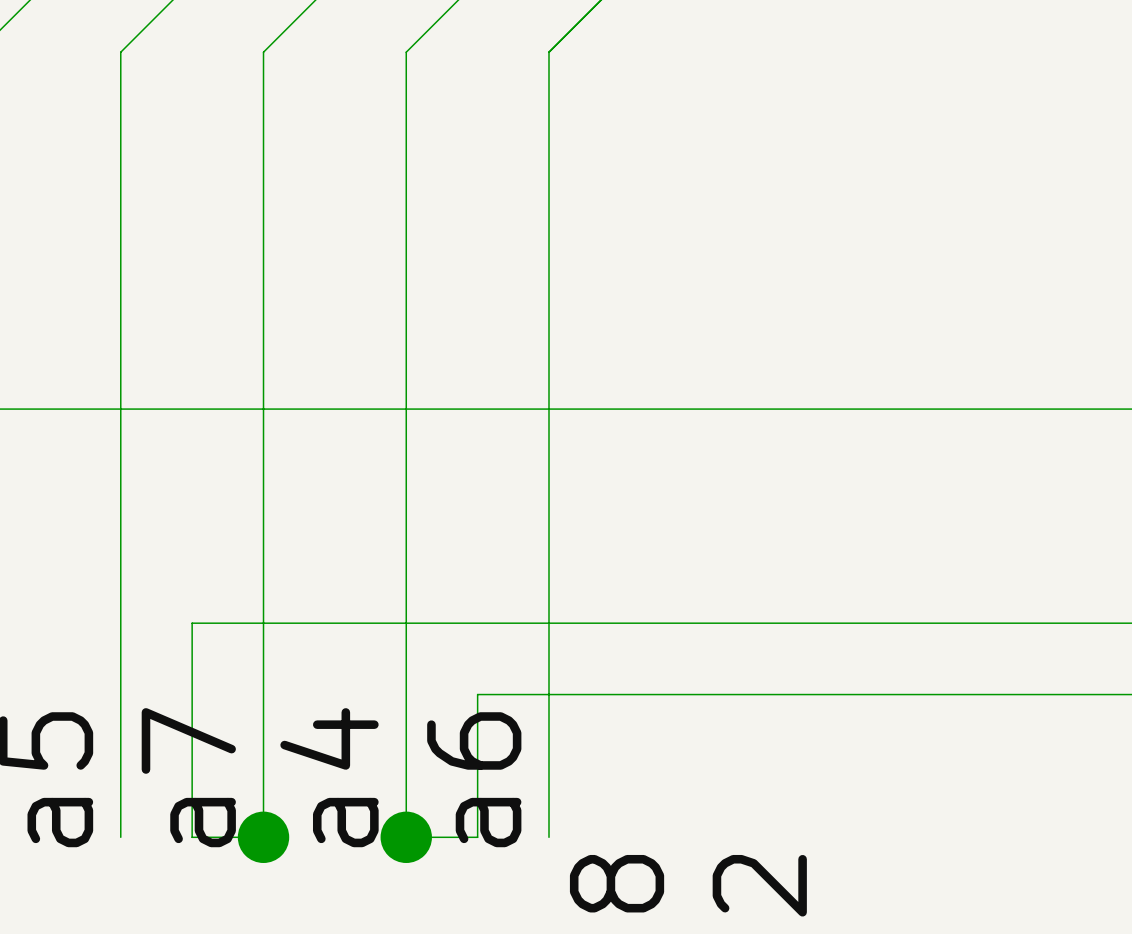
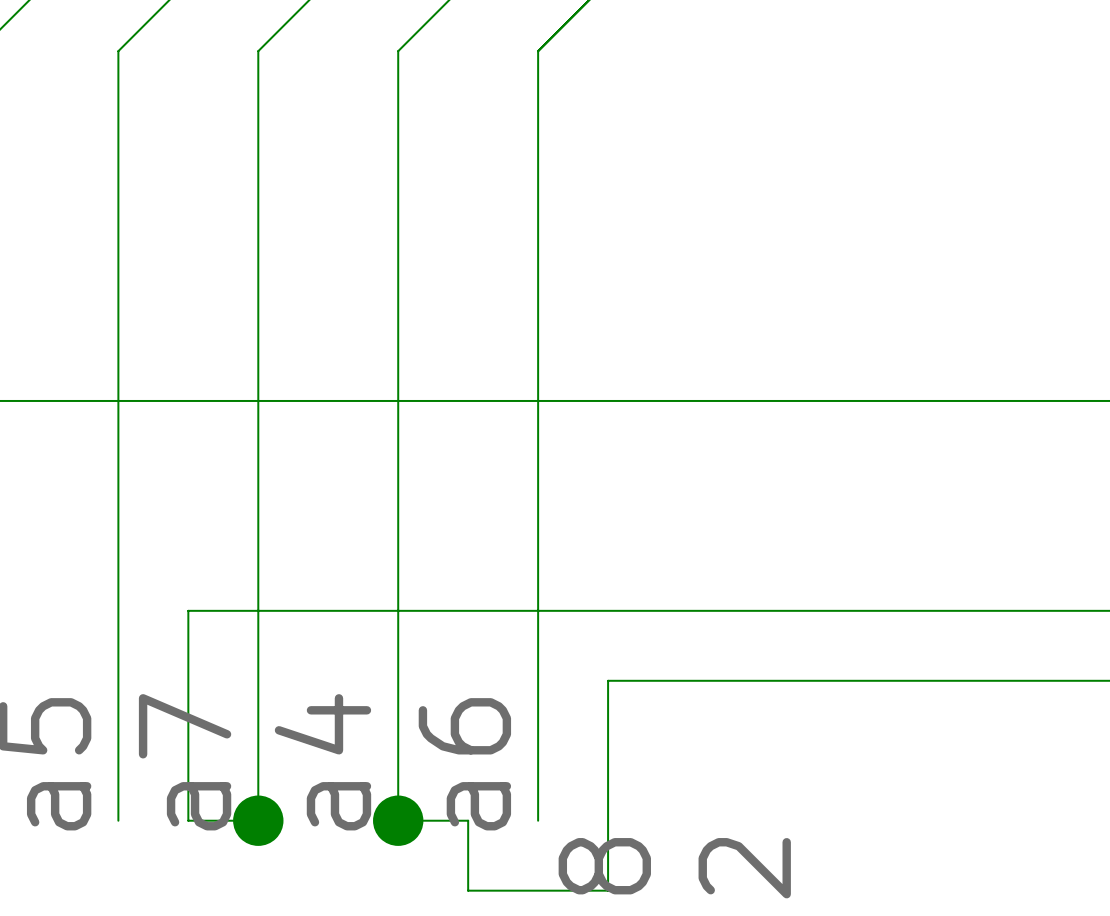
wire: (620, 694) (477, 694) (477, 837) -> (608, 680) (608, 890) (468, 890) (468, 820)

